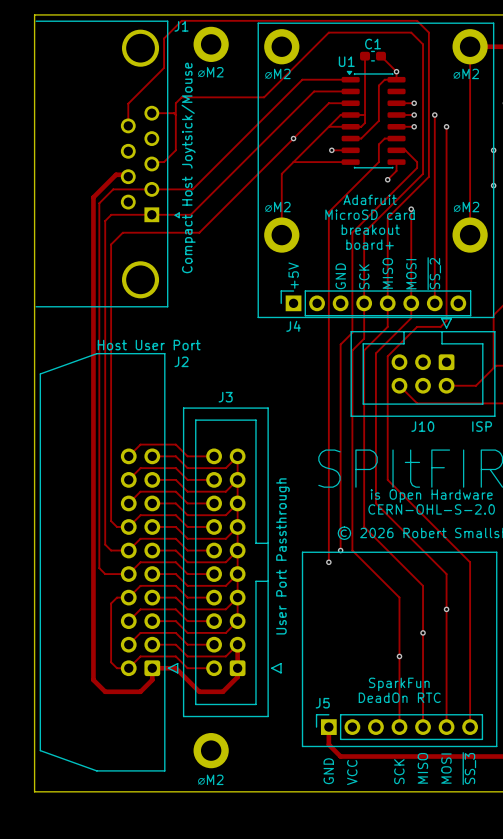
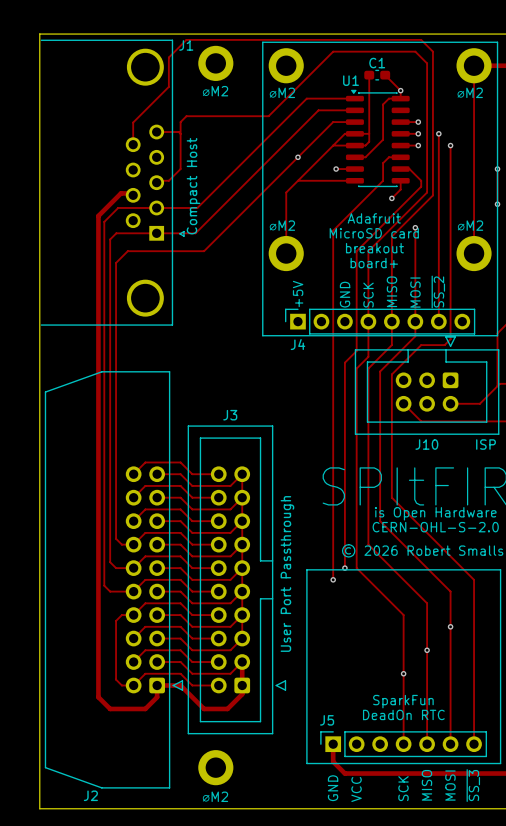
J1 value: Compact Host Joytsick/Mouse (188, 167) -> Compact Host (193, 186)
J2 value: Host User Port (149, 345) -> none
J2 name position: J2 (181, 361) -> J2 (90, 795)

